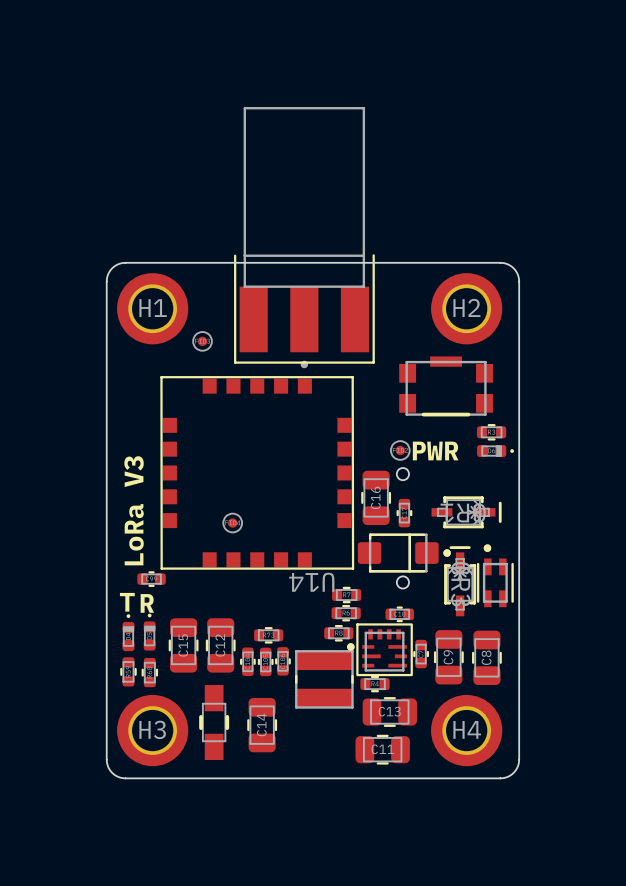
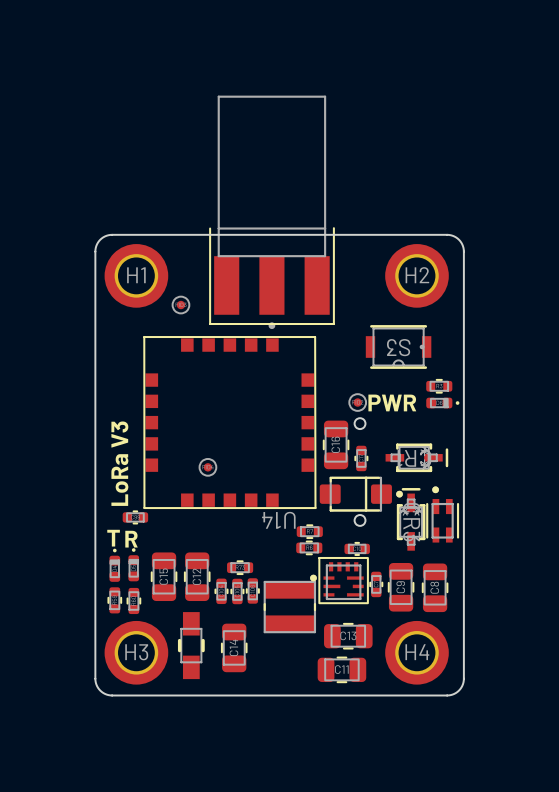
part: (446, 386) -> none
S3: none -> (398, 346)
part: (338, 633) -> none
part: (375, 684) -> none

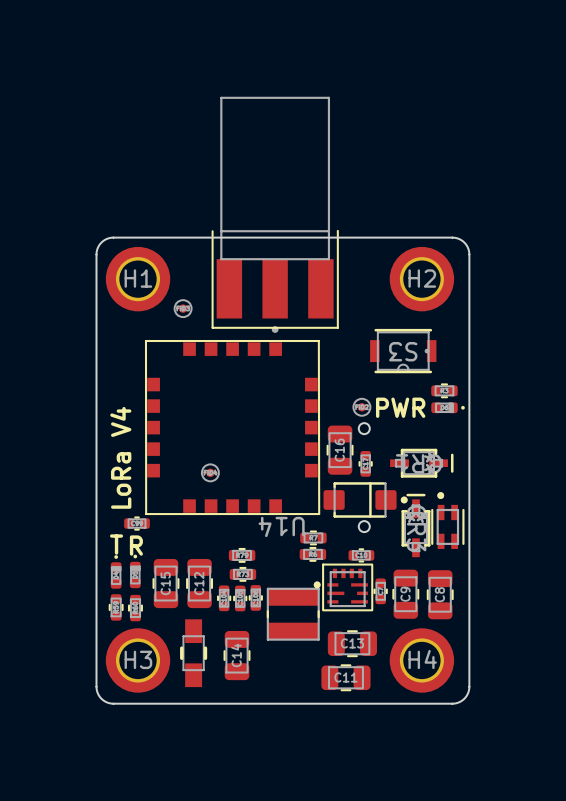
text: LoRa V3 (119, 463) -> LoRa V4 (120, 457)
part: none -> (242, 555)

